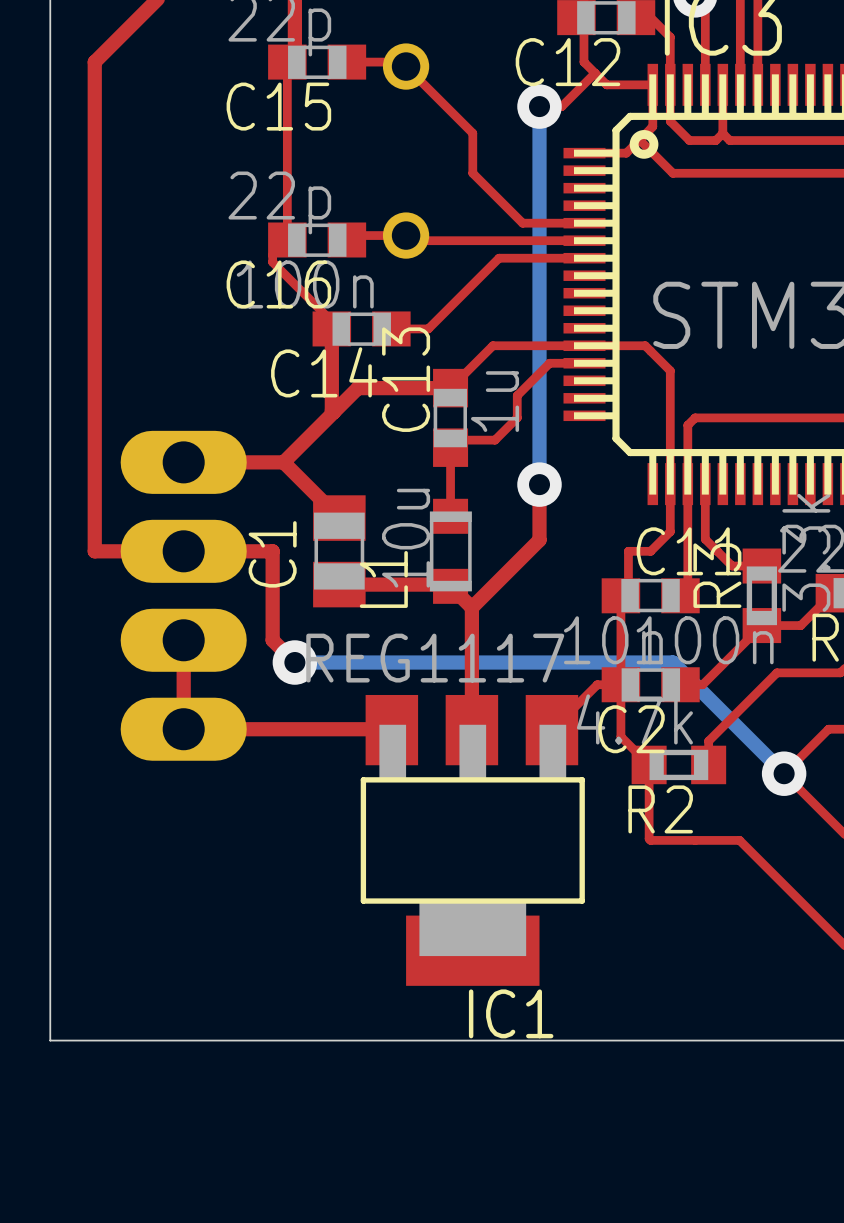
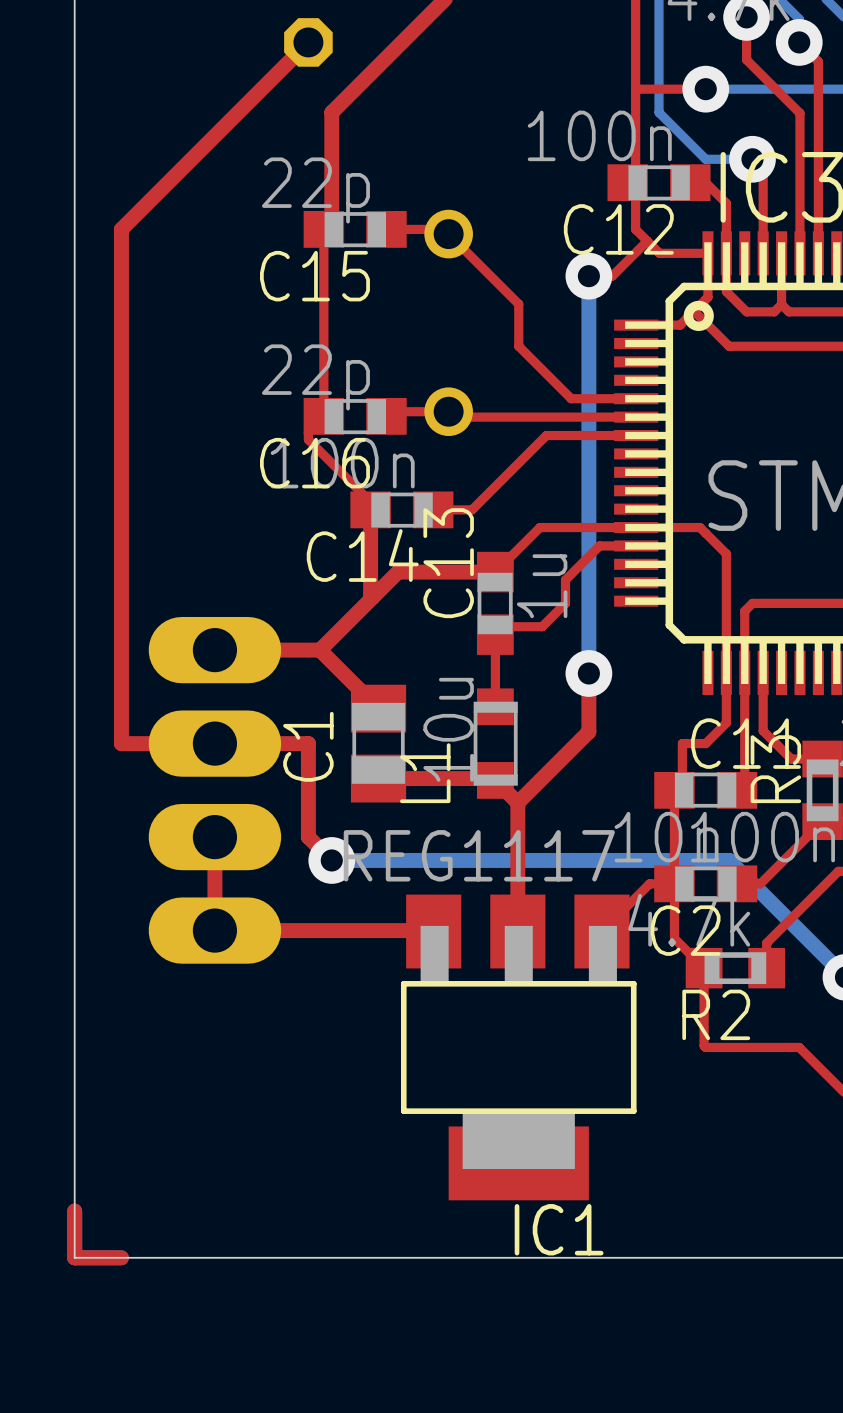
top track: none -> (74, 1211) (74, 1257) (121, 1257)

